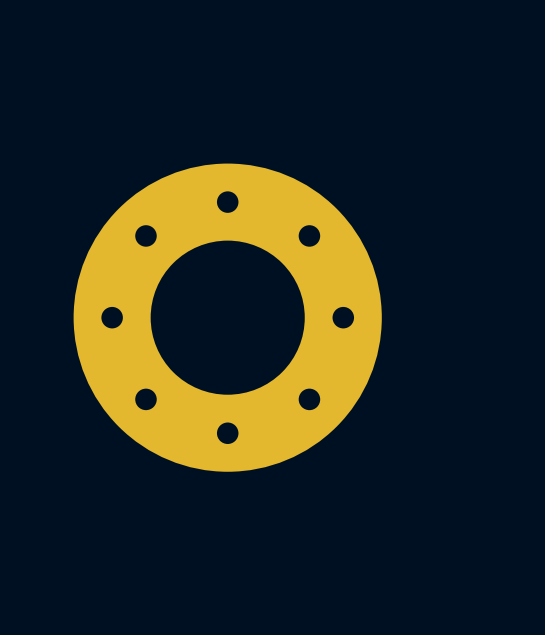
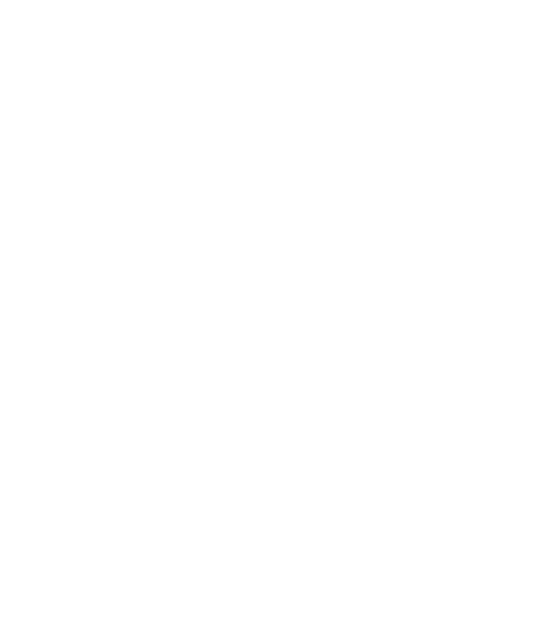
part: (227, 317) -> none

